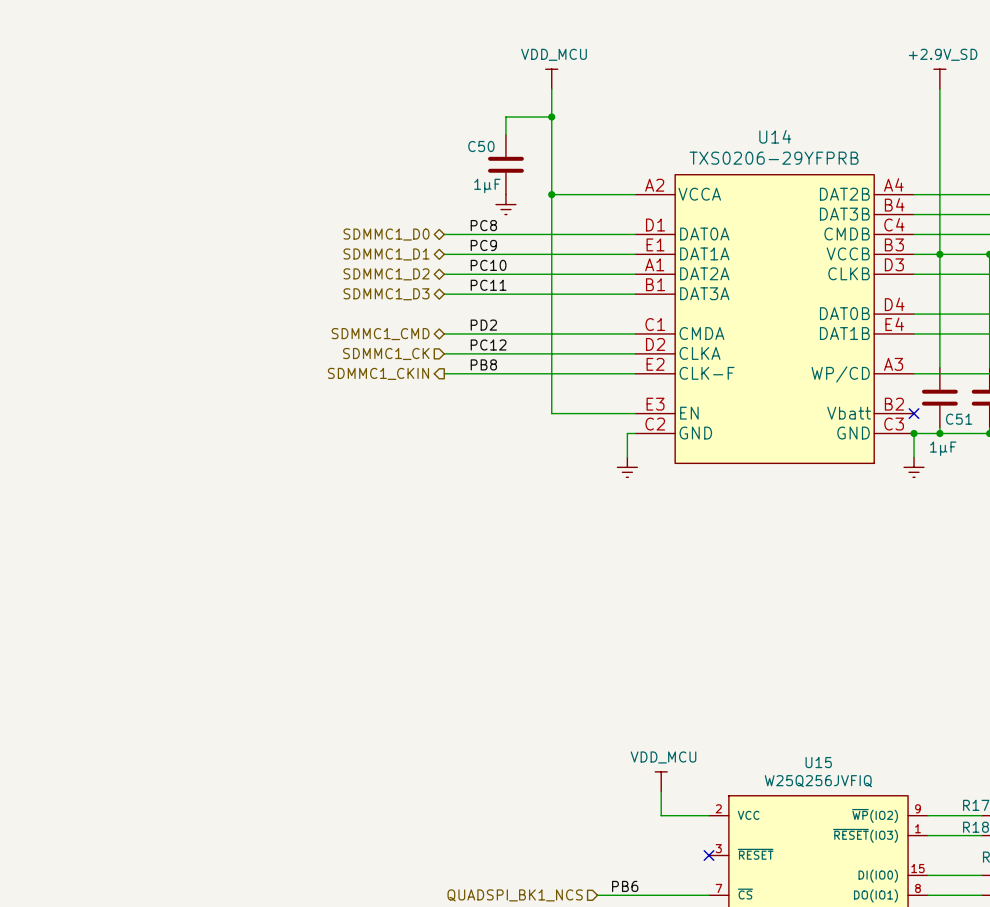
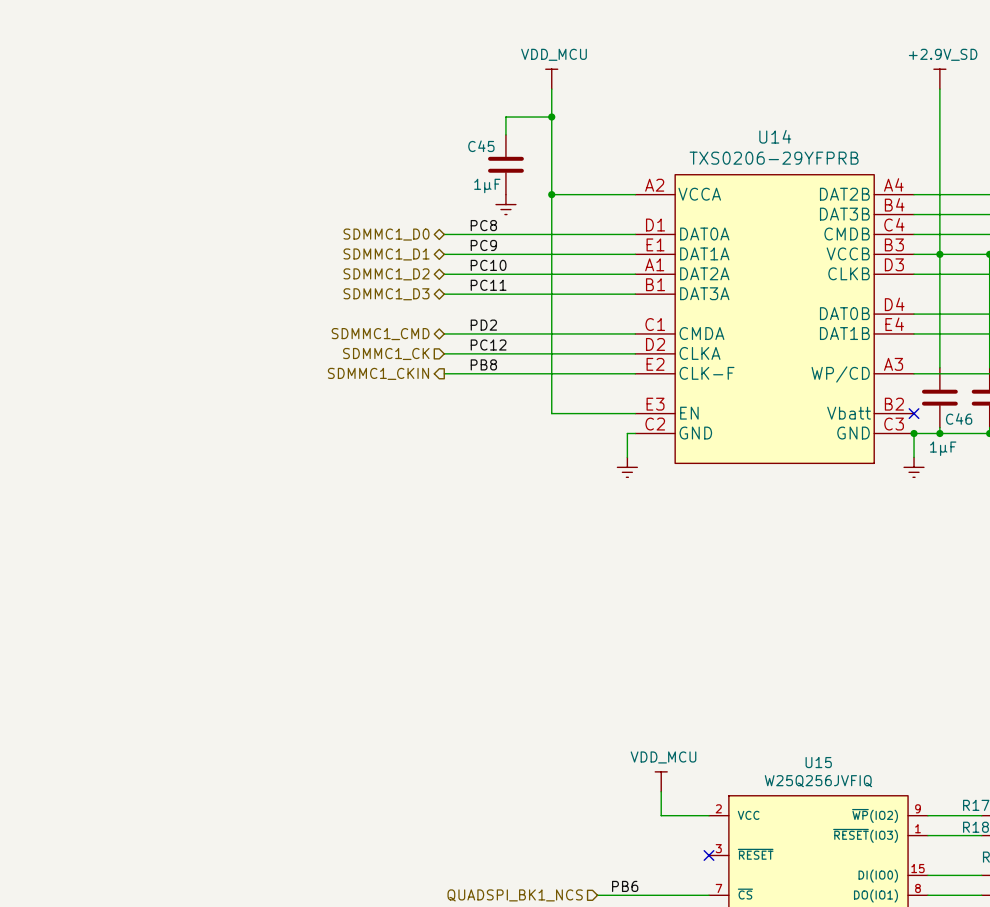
C50 name: C50 (481, 146) -> C45 (481, 146)
C51 name: C51 (959, 419) -> C46 (959, 418)

